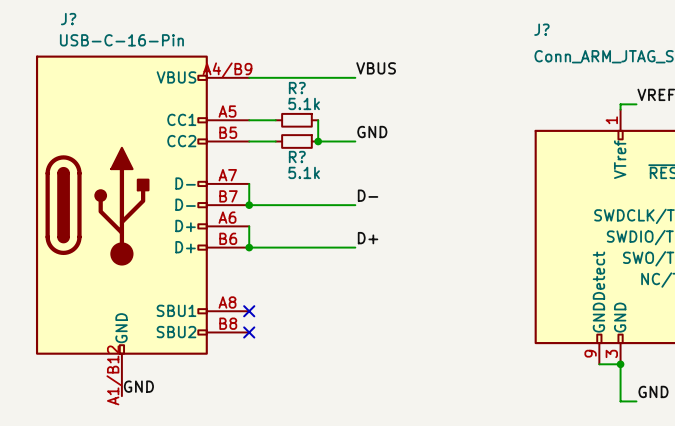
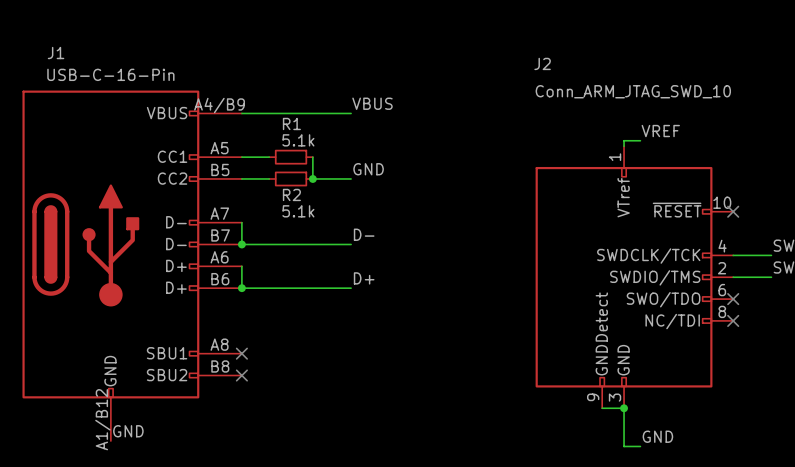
J? name: J? (68, 19) -> J1 (56, 53)
J? name: J? (541, 29) -> J2 (542, 63)
R? name: R? (297, 88) -> R1 (291, 123)
R? name: R? (297, 157) -> R2 (291, 194)

